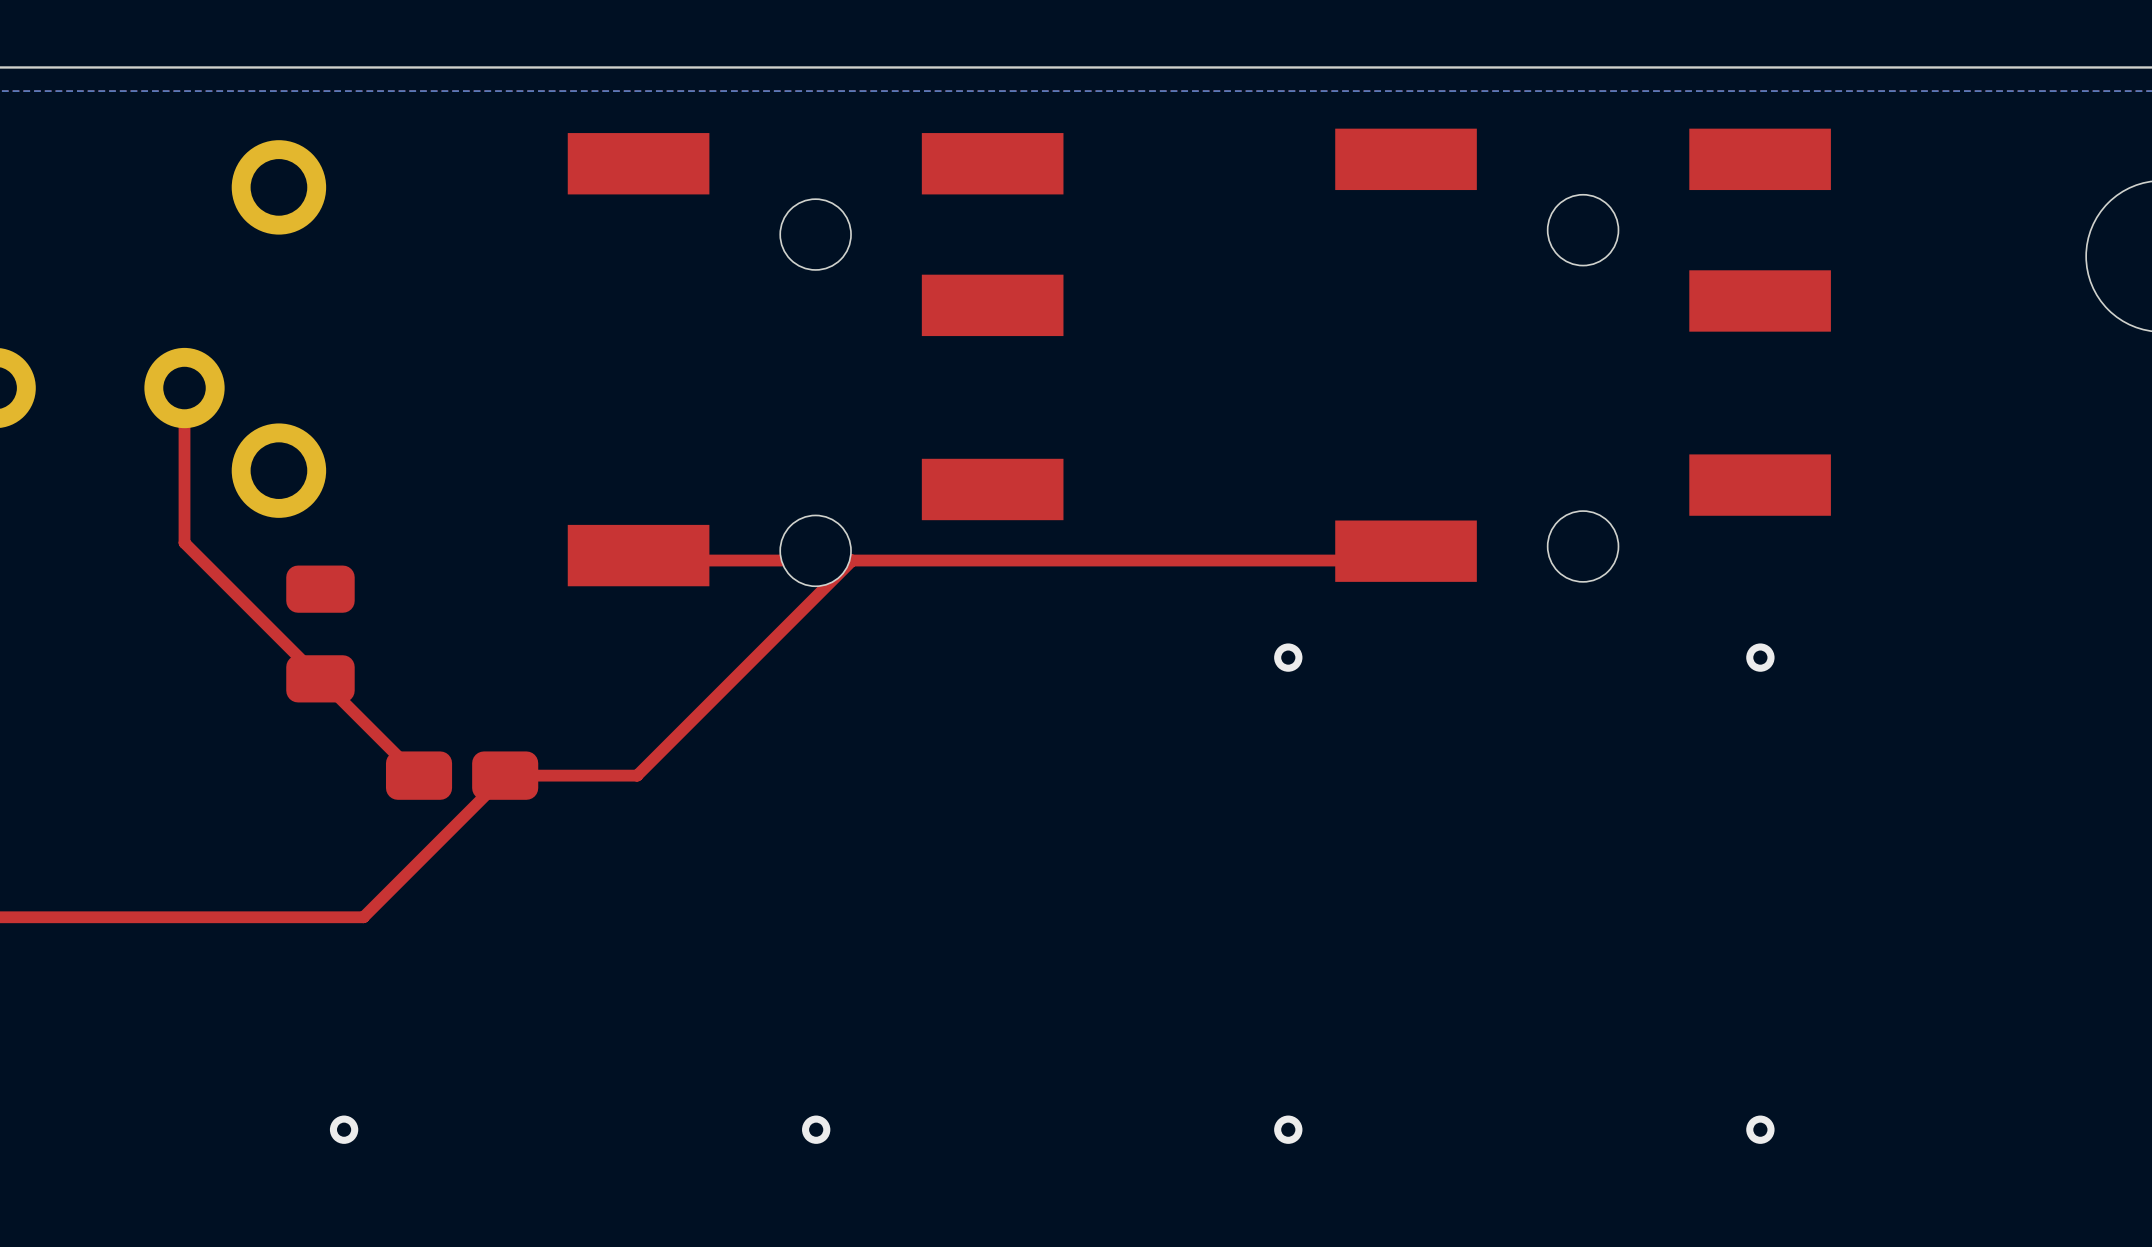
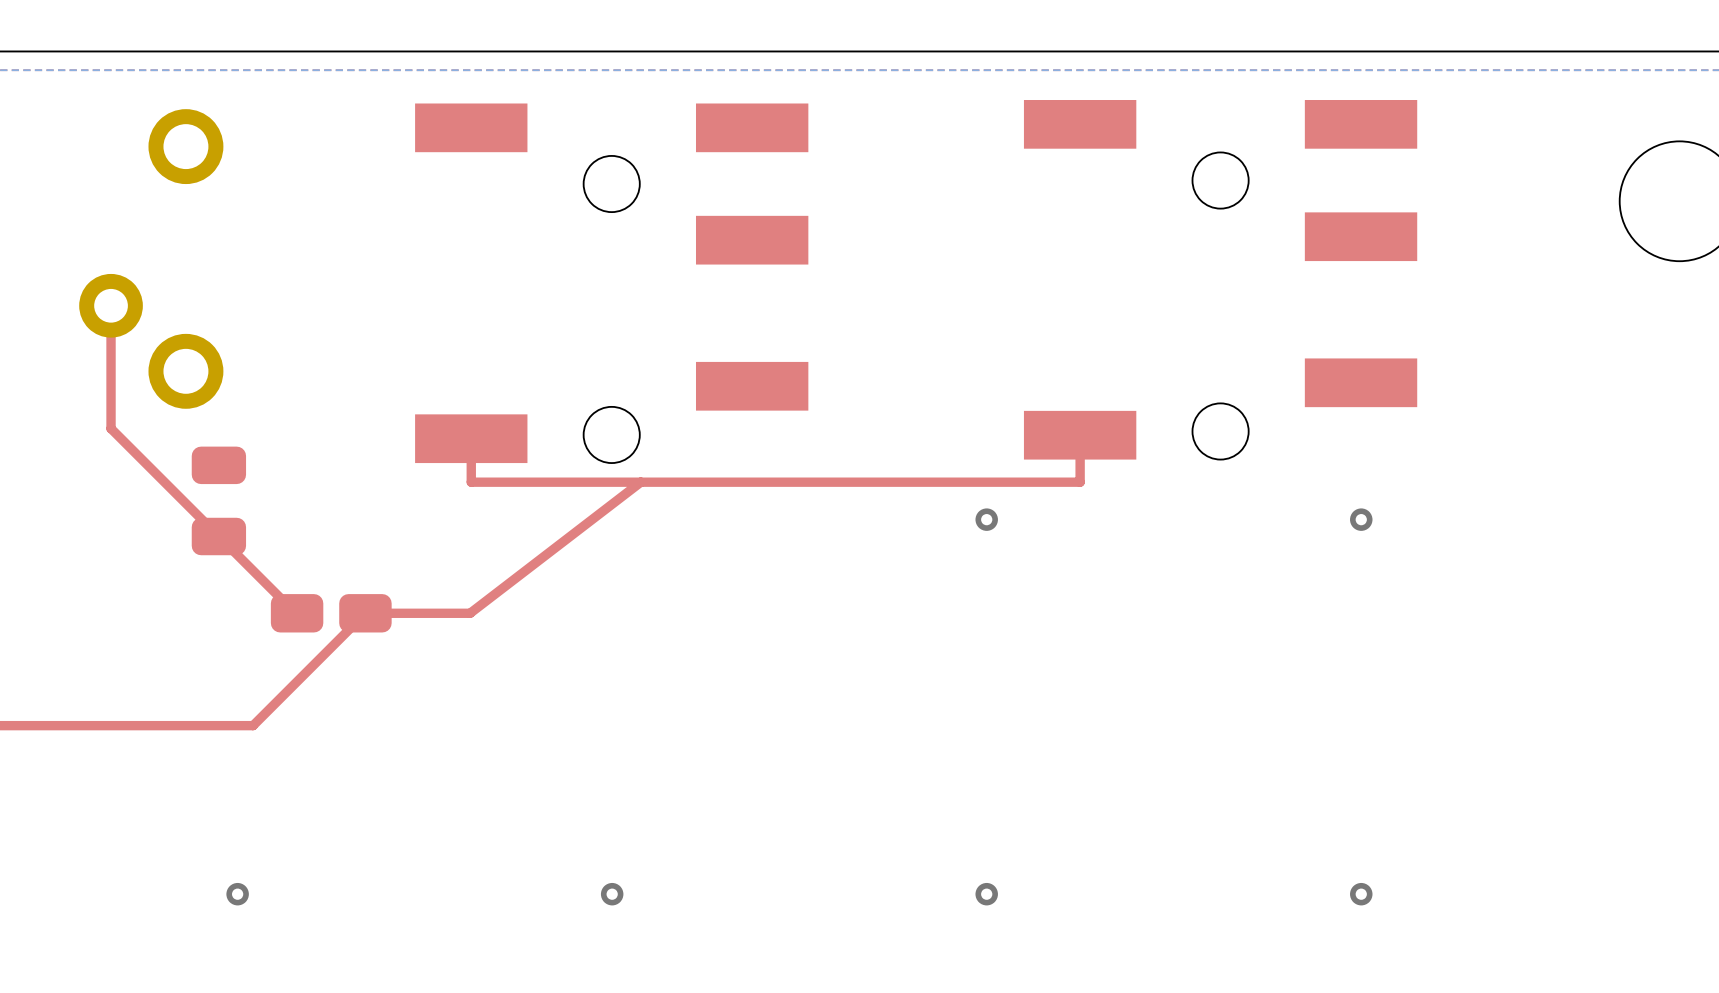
top track: (852, 560) (637, 775) -> (640, 482) (470, 613)
top track: (1406, 560) (638, 560) -> (1080, 442) (1080, 482) (471, 482) (471, 442)

